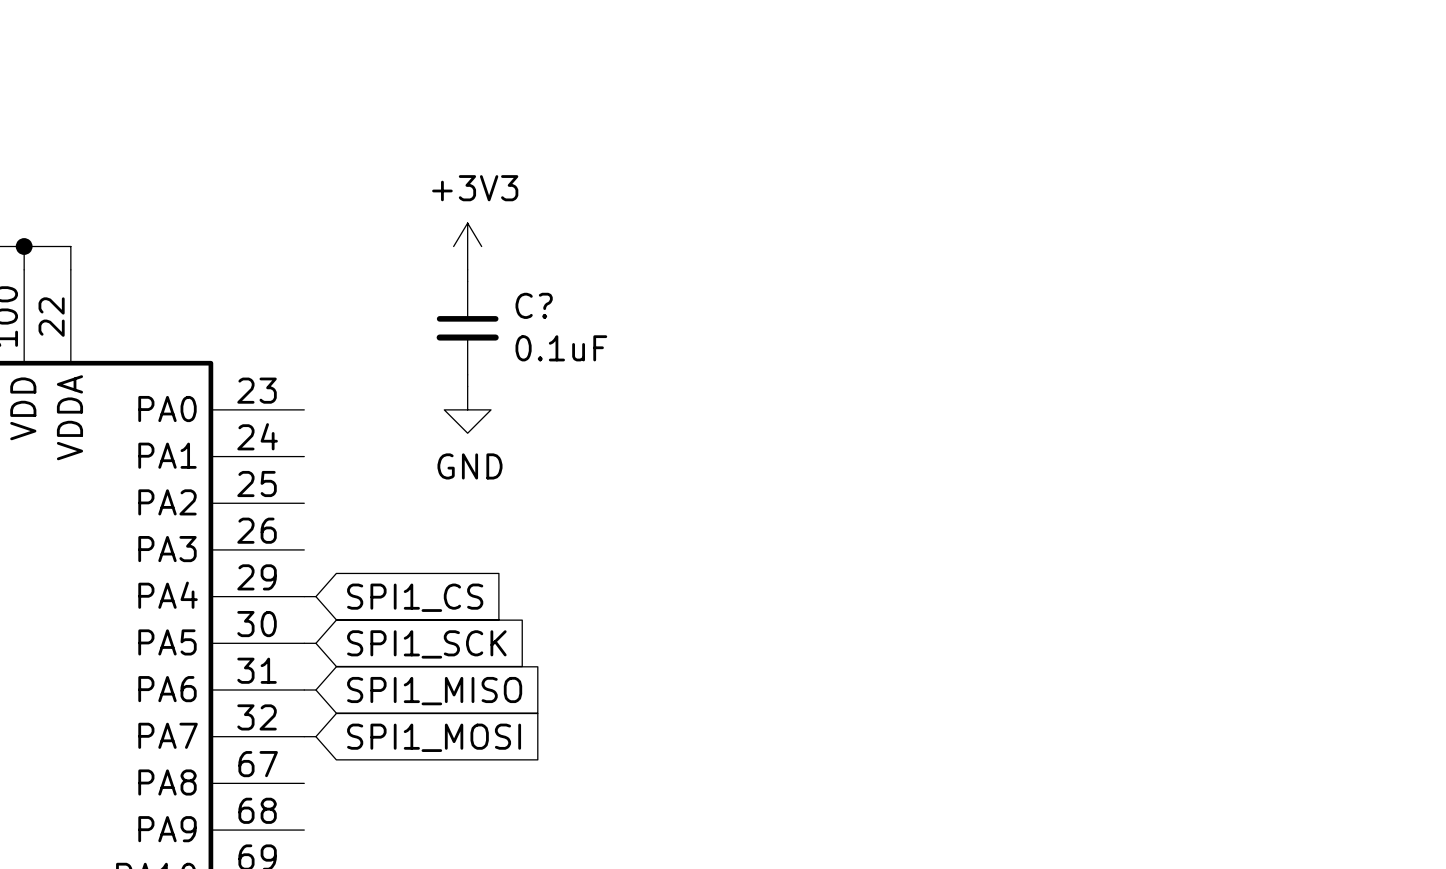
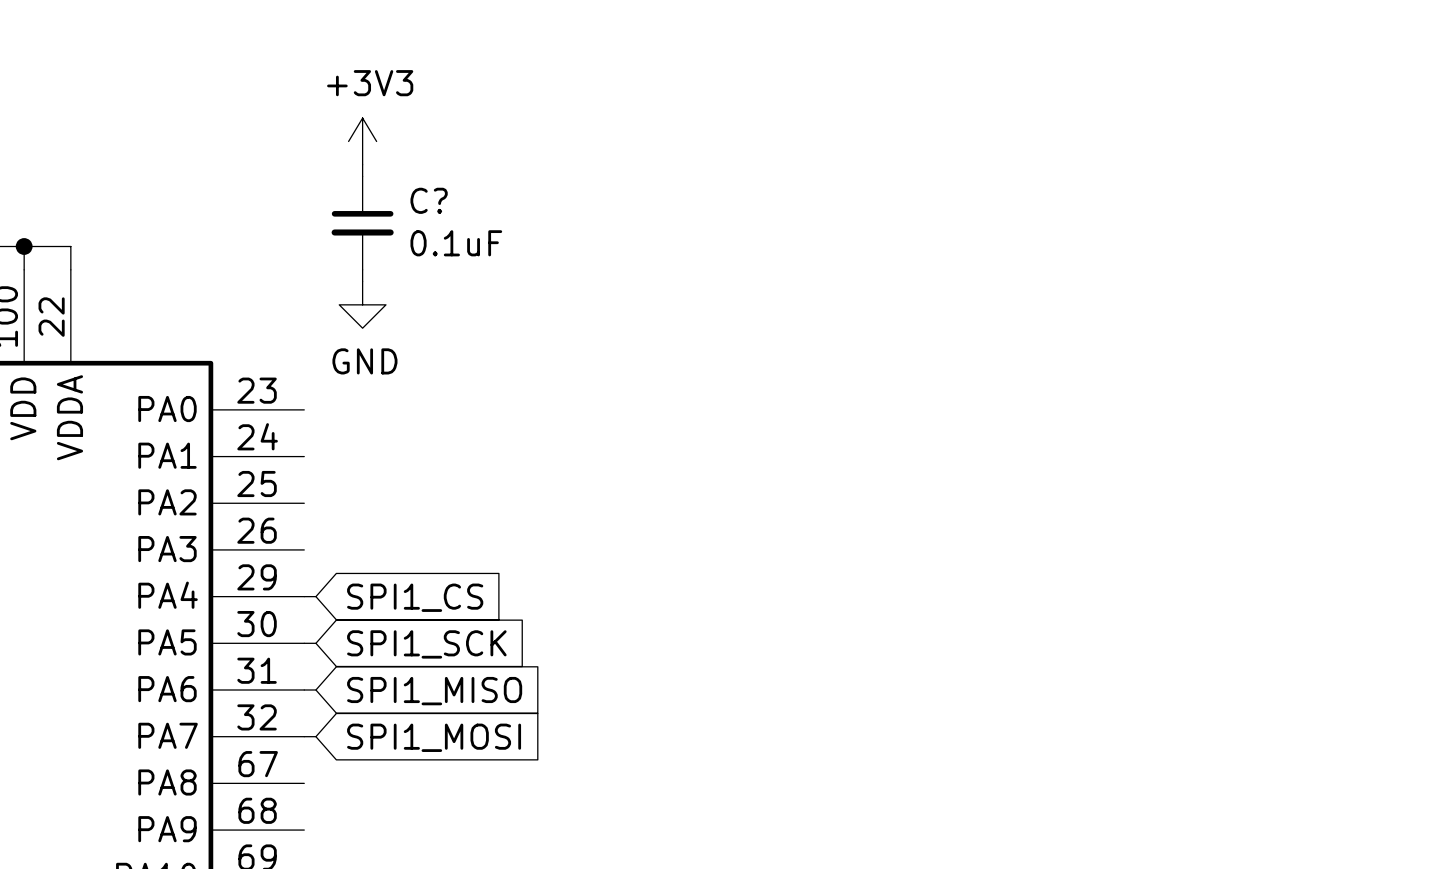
power symbol position: +3V3 (467, 246) -> +3V3 (362, 141)
wire: (467, 269) (467, 281) -> (362, 269) (362, 281)
C? position: (467, 328) -> (362, 223)
wire: (467, 374) (467, 386) -> (362, 164) (362, 176)
power symbol position: GND (467, 409) -> GND (362, 304)

